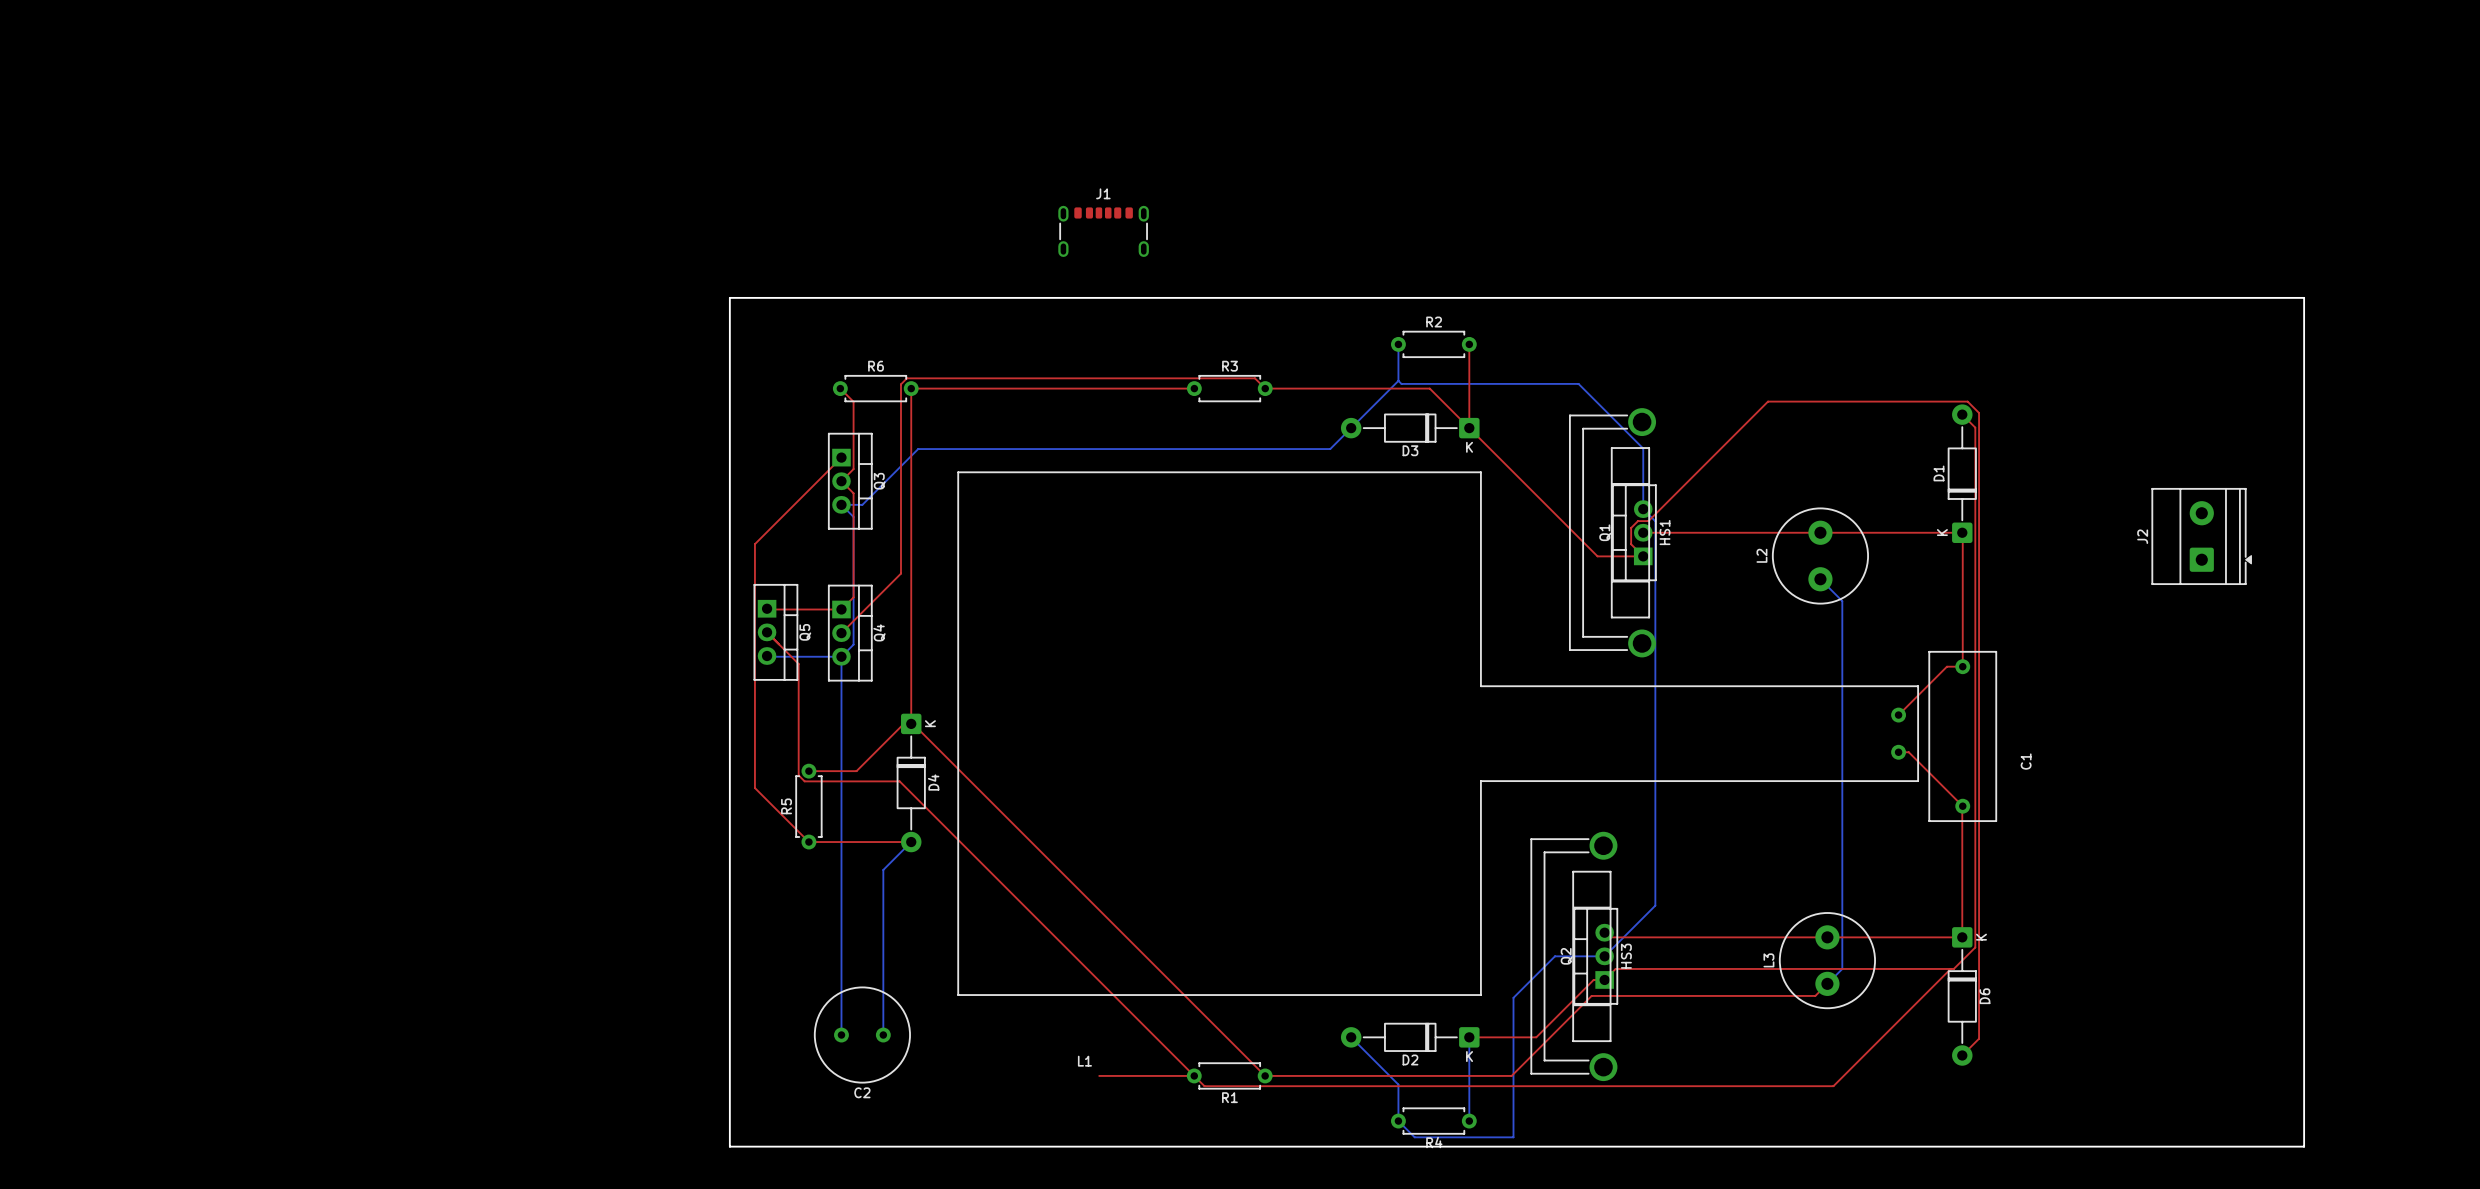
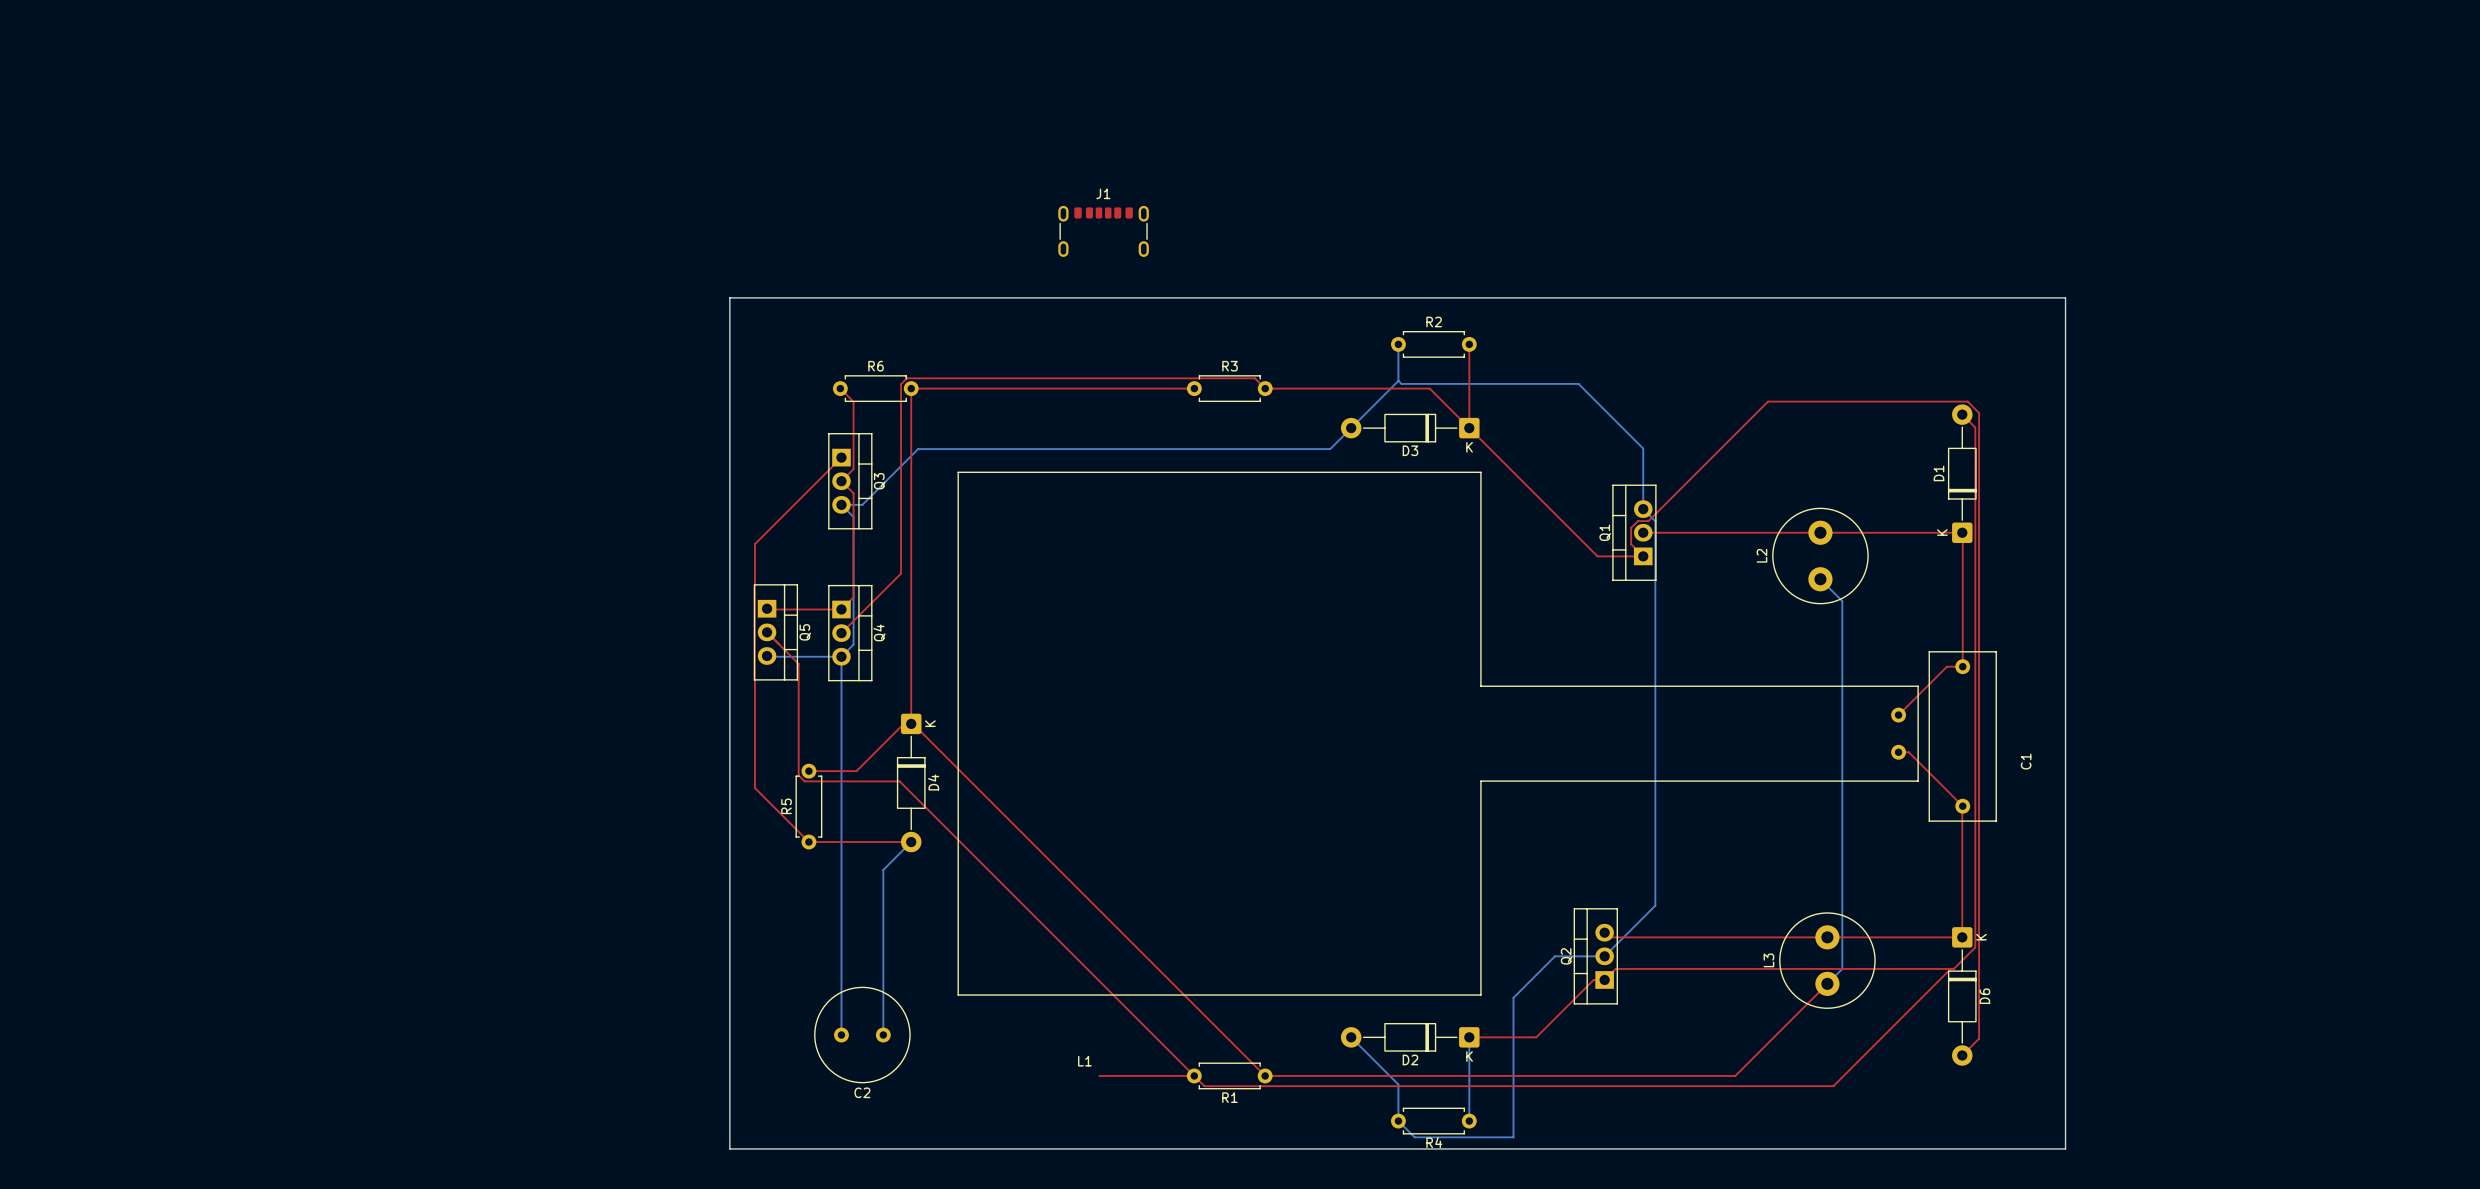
board edge: (2065, 297) (2304, 297) (2304, 1146) (729, 1146) -> (2065, 297) (2065, 1148) (729, 1148) (729, 1146)
HS1: (1612, 532) -> none
J2: (2201, 536) -> none
HS3: (1574, 956) -> none
top track: (1815, 995) (1591, 995) (1511, 1075) -> (1815, 995) (1735, 1075) (1511, 1075)

